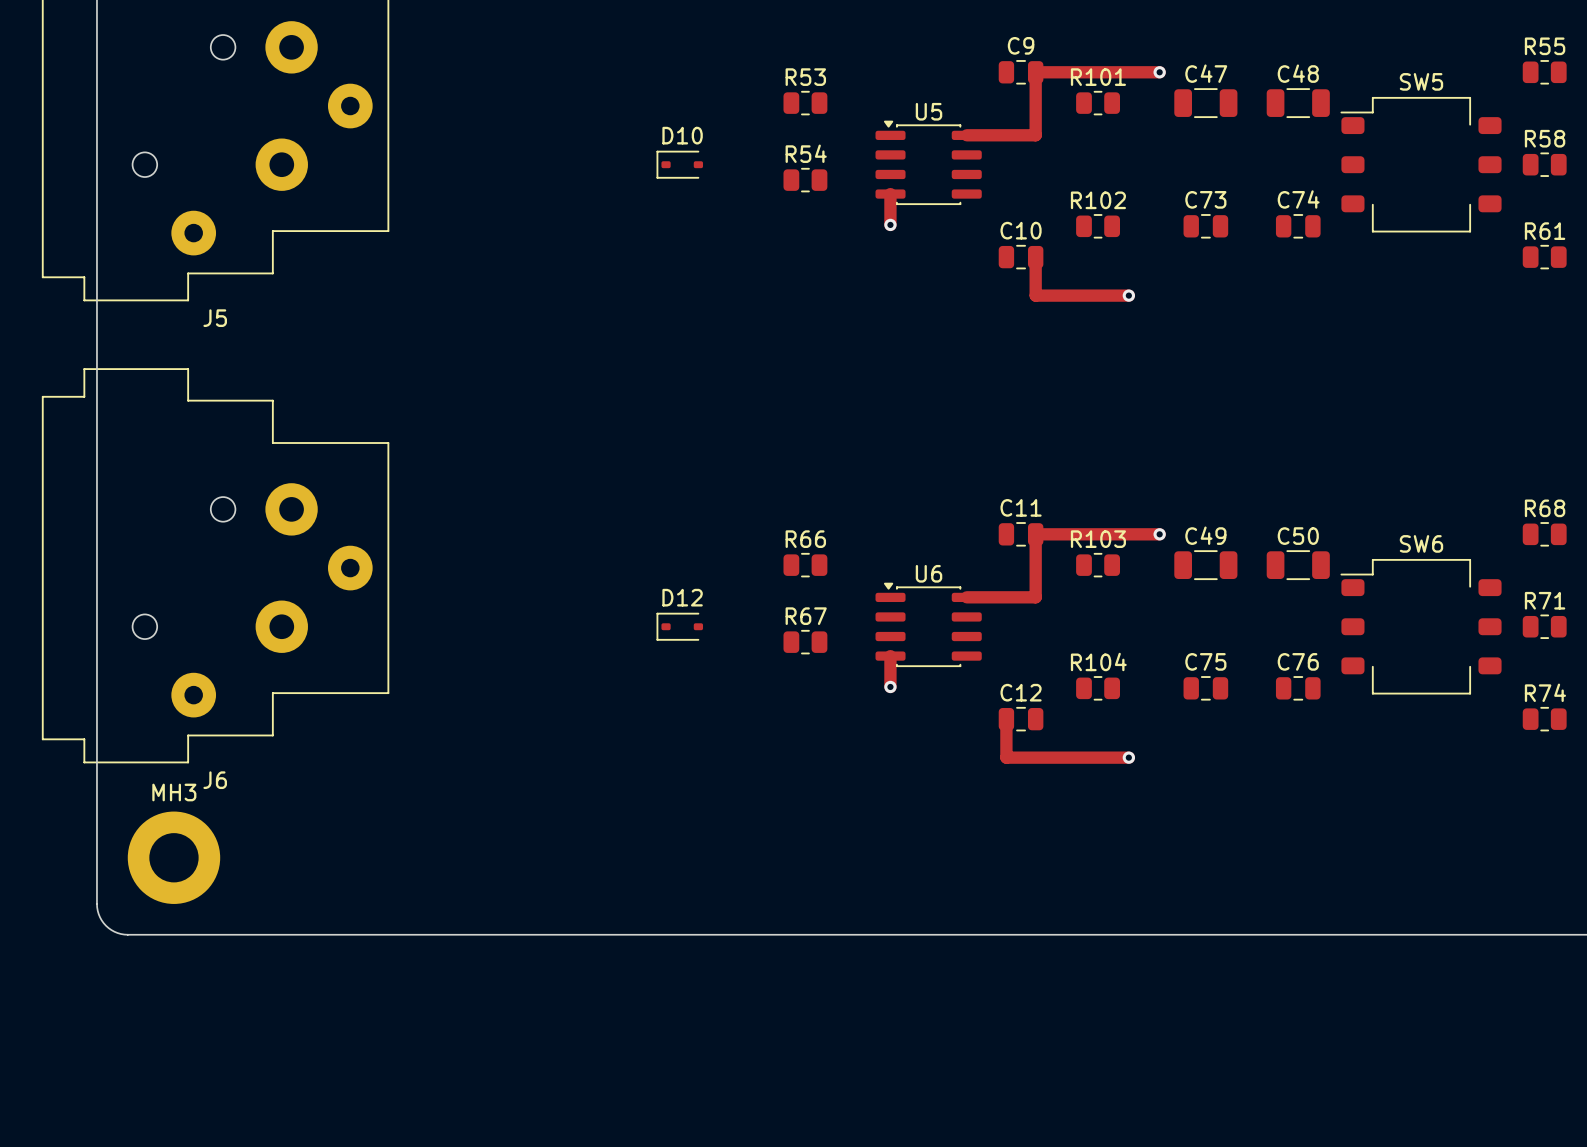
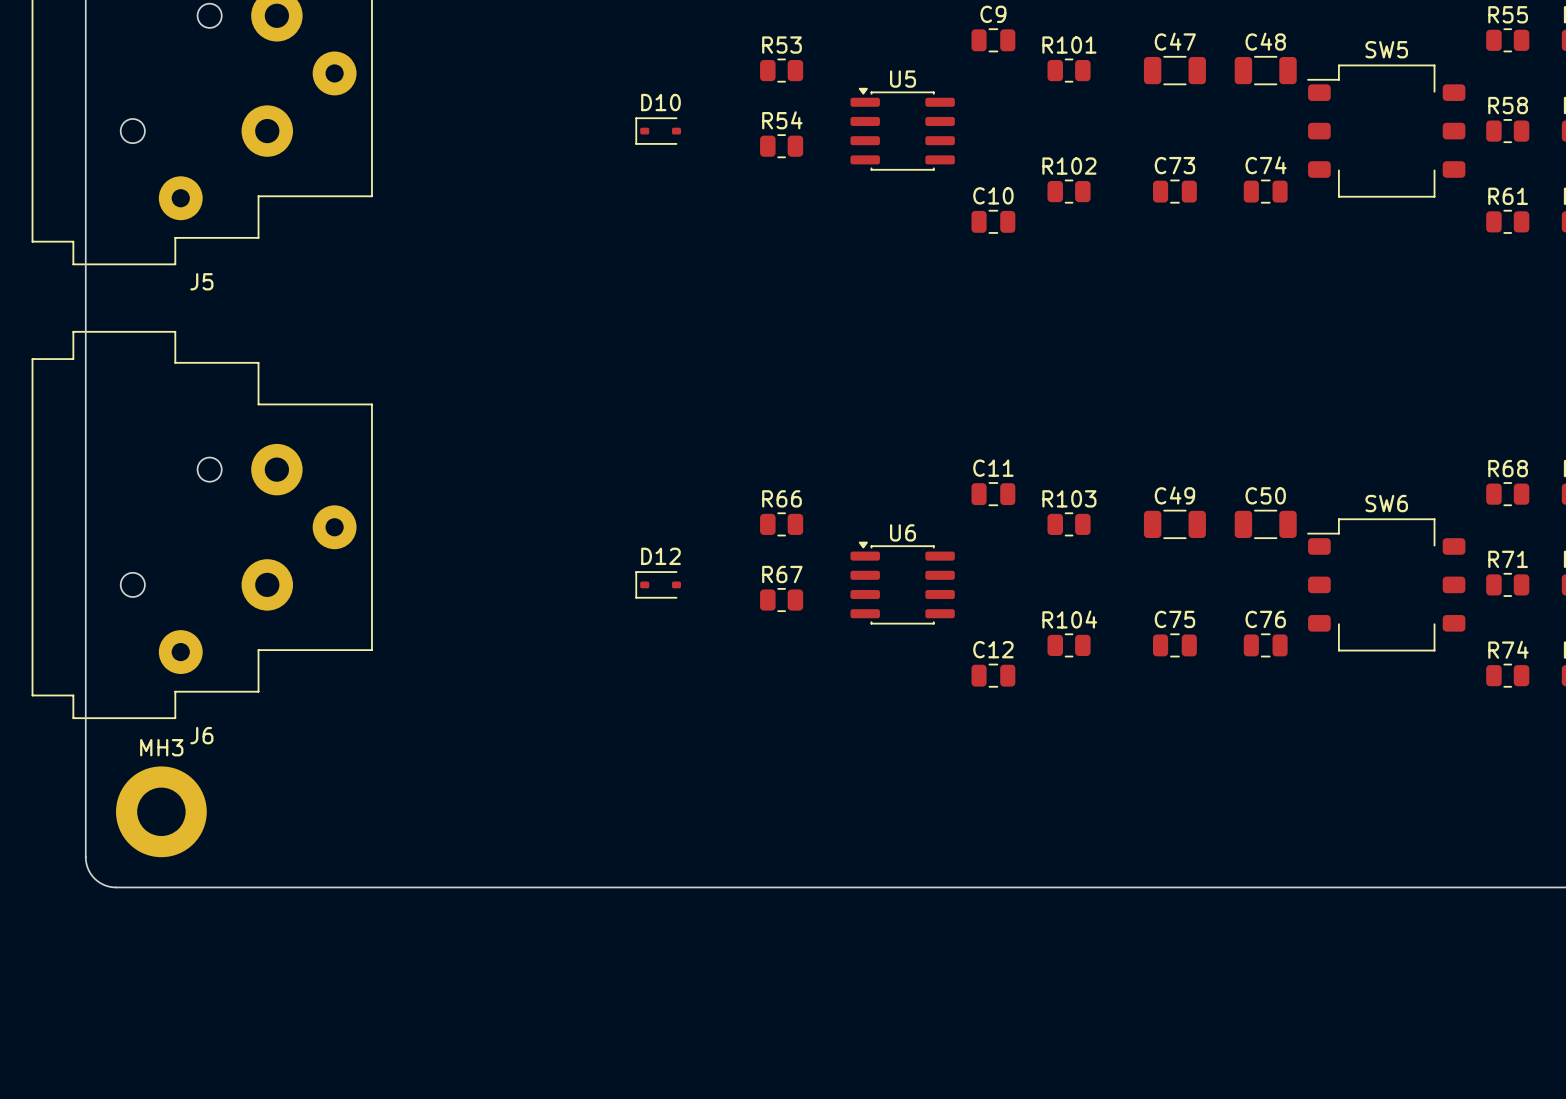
track: (1159, 72) (1035, 72) (1035, 135) (966, 135) -> none
via: (1159, 72) -> none
track: (890, 194) (890, 224) -> none
via: (890, 224) -> none
track: (1035, 257) (1035, 295) (1128, 295) -> none
via: (1128, 295) -> none
track: (1159, 534) (1035, 534) (1035, 597) (966, 597) -> none
via: (1159, 534) -> none
track: (890, 656) (890, 686) -> none
via: (890, 686) -> none
track: (1006, 719) (1006, 757) (1128, 757) -> none
via: (1128, 757) -> none

